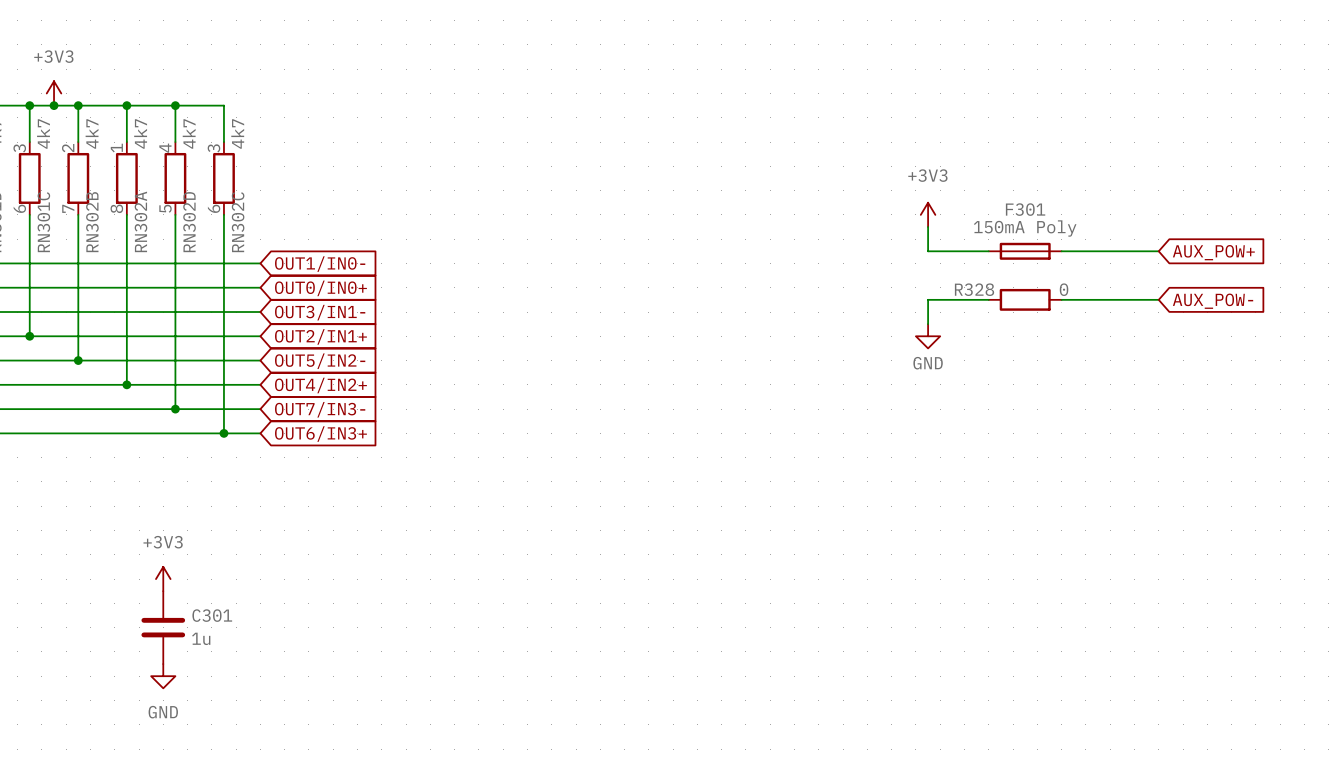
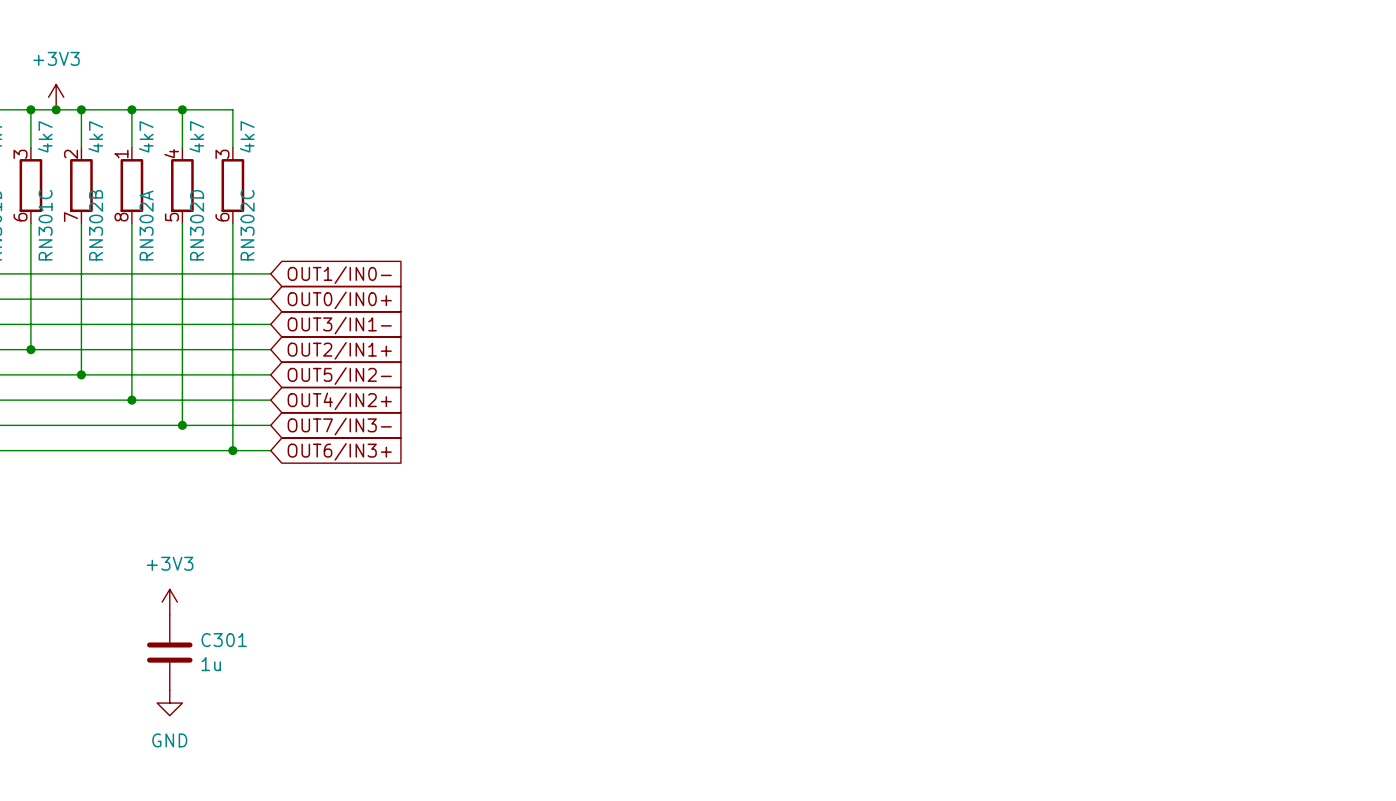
power symbol: +3V3 (928, 214) -> none
wire: (928, 227) (928, 251) (988, 251) -> none
F301: 150mA Poly (1025, 251) -> none
wire: (1061, 251) (1158, 251) -> none
global label: AUX_POW+ (1213, 252) -> none
wire: (988, 299) (928, 299) (928, 324) -> none
R328: 0 (1025, 299) -> none
wire: (1061, 299) (1158, 299) -> none
global label: AUX_POW- (1213, 301) -> none
power symbol: GND (928, 336) -> none

